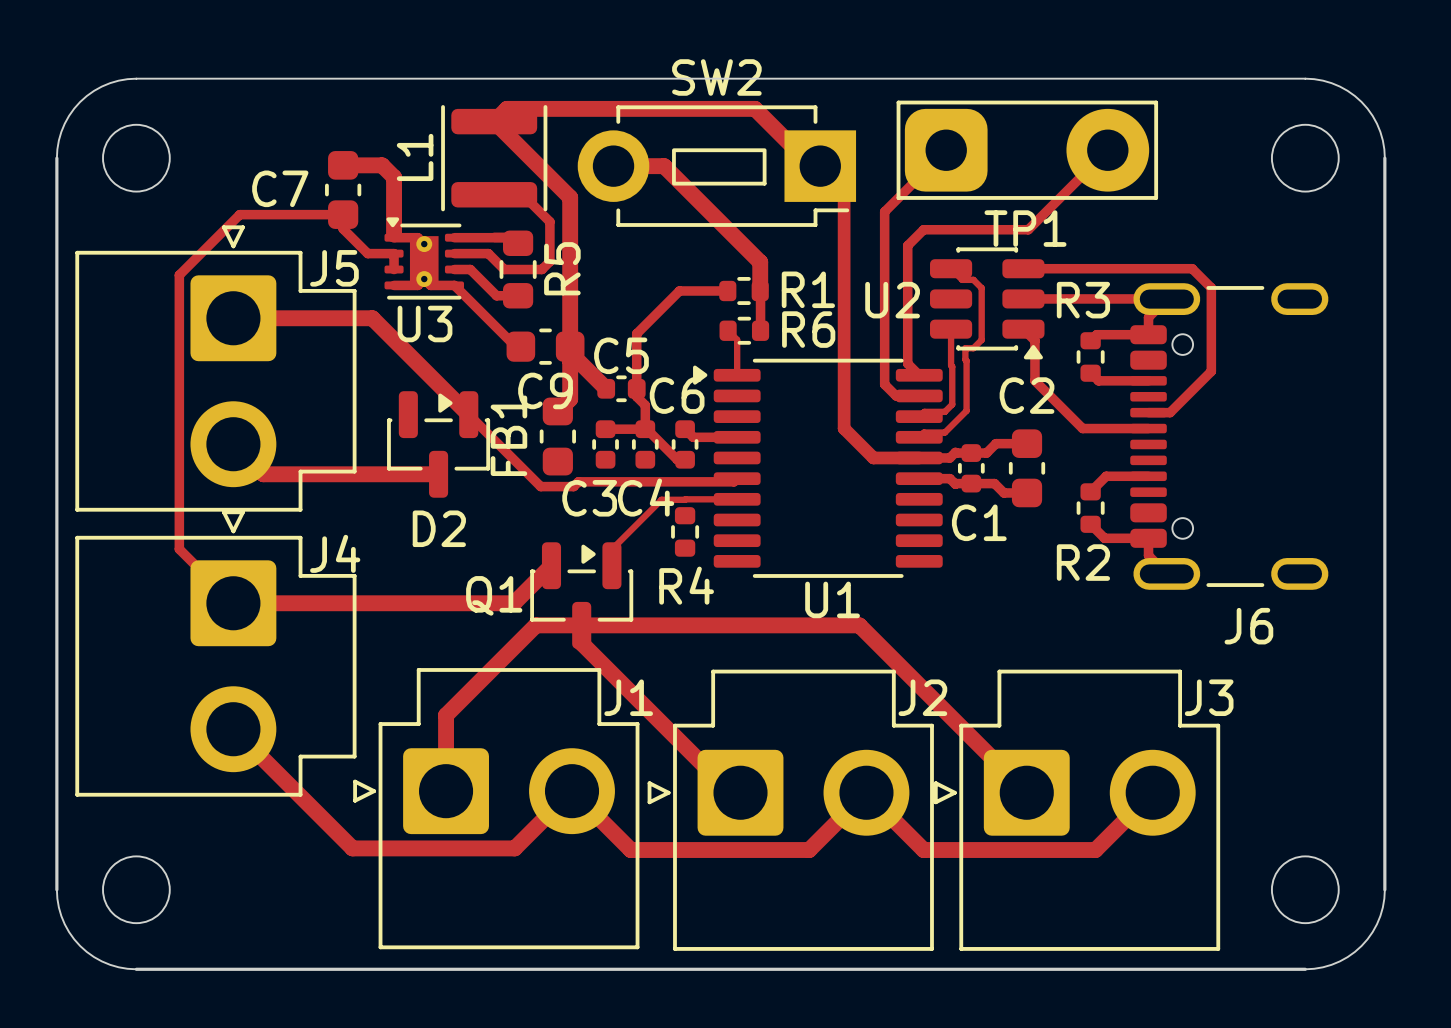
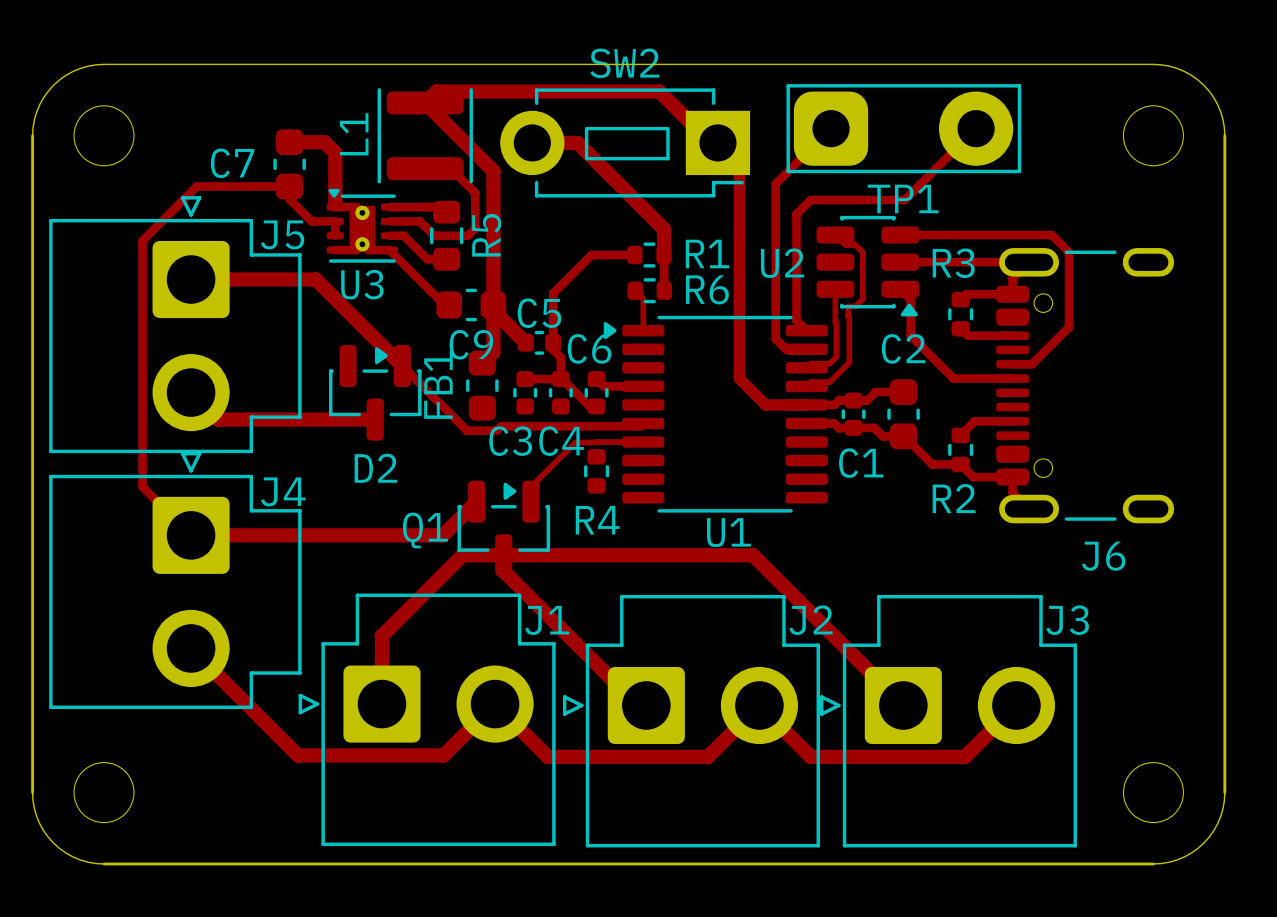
track: none -> (903, 436) (932, 464) (960, 464)

